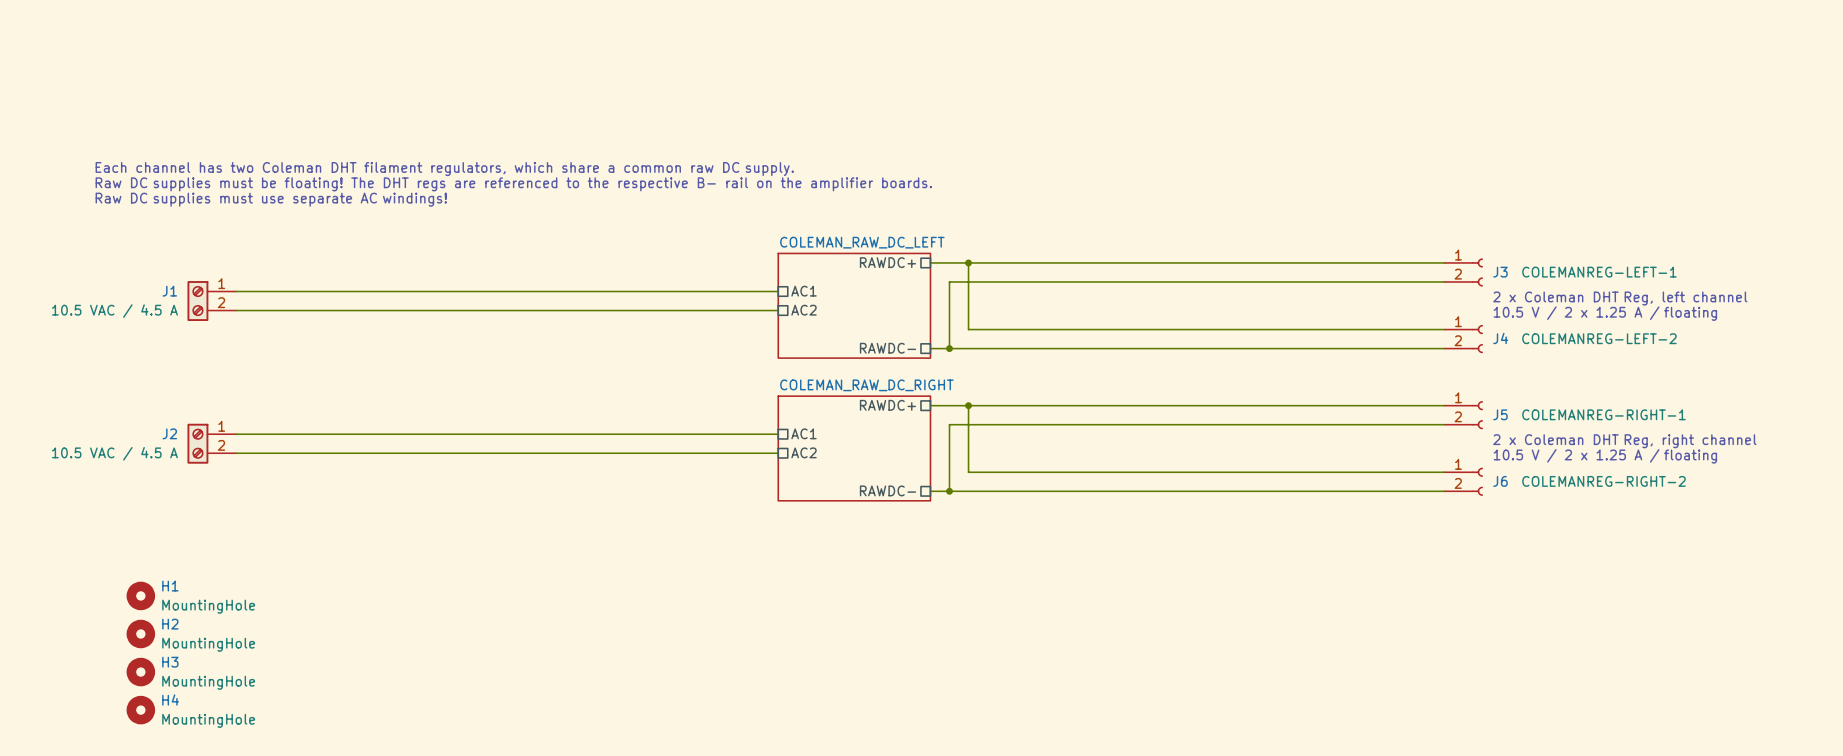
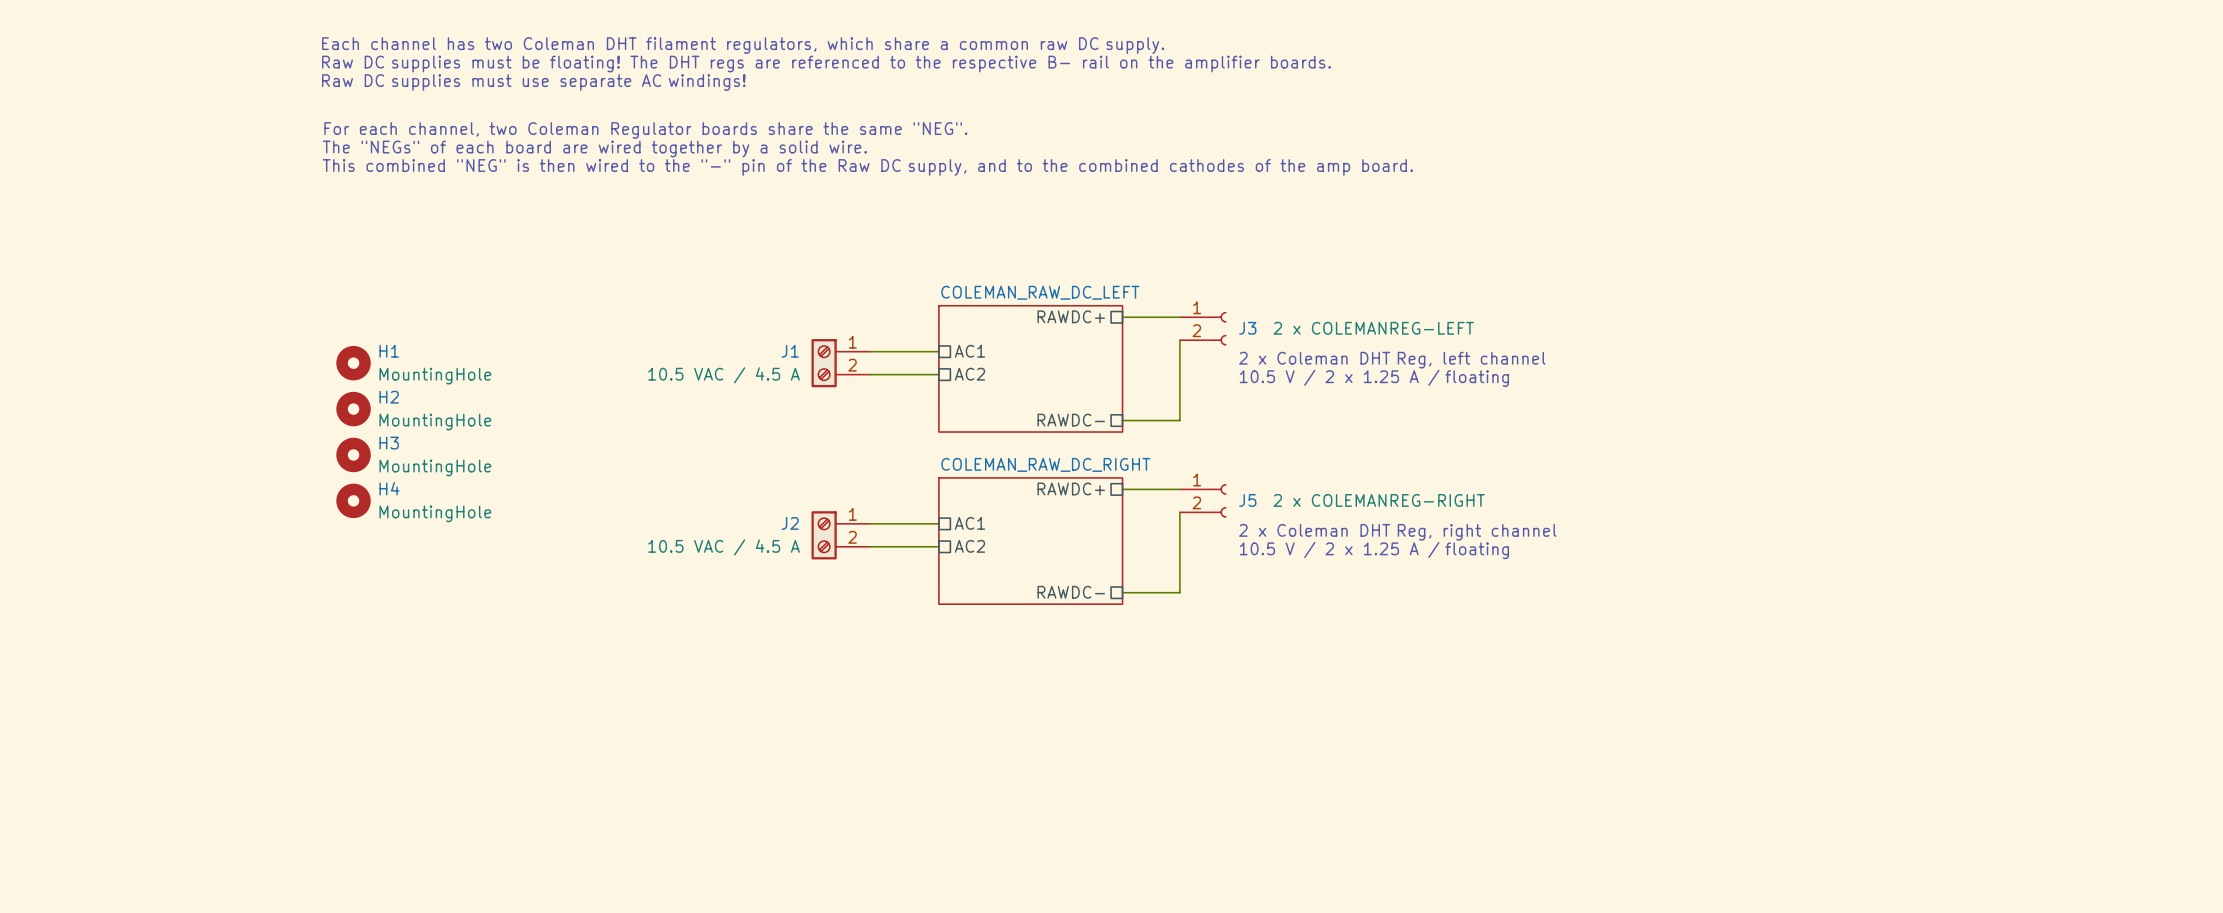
text: none -> Each channel has two Coleman DHT filament regulators, which share a common raw DC supply. (743, 45)
text: none -> Raw DC supplies must be floating! The DHT regs are referenced to the respective B- rail on the amplifier boards. (826, 64)
text: none -> Raw DC supplies must use separate AC windings! (533, 82)
text: none -> For each channel, two Coleman Regulator boards share the same "NEG". (645, 130)
text: none -> The "NEGs" of each board are wired together by a solid wire. (594, 148)
text: none -> This combined "NEG" is then wired to the "-" pin of the Raw DC supply, and to the combined cathodes of the amp board. (867, 167)
text: Each channel has two Coleman DHT filament regulators, which share a common raw DC supply. (444, 169) -> none
text: Raw DC supplies must be floating! The DHT regs are referenced to the respective B- rail on the amplifier boards. (513, 184) -> none
text: Raw DC supplies must use separate AC windings! (271, 199) -> none
wire: (968, 262) (968, 329) (1444, 329) -> none
junction: (968, 262) -> none
wire: (978, 262) (1444, 262) -> none
J3 position: (1463, 272) -> (1203, 328)
J3 value: COLEMANREG-LEFT-1 (1599, 272) -> 2 x COLEMANREG-LEFT (1373, 328)
wire: (1444, 281) (949, 281) (949, 348) -> none
wire: (235, 291) (721, 291) -> none
text: none -> 2 x Coleman DHT Reg, left channel (1392, 360)
text: 2 x Coleman DHT Reg, left channel (1620, 298) -> none
J1 position: (211, 301) -> (840, 363)
wire: (235, 310) (721, 310) -> none
text: none -> 10.5 V / 2 x 1.25 A / floating (1374, 378)
text: 10.5 V / 2 x 1.25 A / floating (1605, 313) -> none
J4: COLEMANREG-LEFT-2 (1463, 339) -> none
junction: (949, 348) -> none
wire: (978, 348) (1444, 348) -> (1179, 420) (1179, 340)
wire: (968, 405) (968, 472) (1444, 472) -> none
junction: (968, 405) -> none
wire: (978, 405) (1444, 405) -> none
J5 value: COLEMANREG-RIGHT-1 (1603, 414) -> 2 x COLEMANREG-RIGHT (1379, 500)
J5 position: (1463, 415) -> (1203, 500)
wire: (1444, 424) (949, 424) (949, 491) -> none
wire: (235, 434) (721, 434) -> none
text: none -> 2 x Coleman DHT Reg, right channel (1397, 532)
text: 2 x Coleman DHT Reg, right channel (1624, 441) -> none
J2 position: (211, 443) -> (840, 535)
wire: (235, 453) (721, 453) -> none
text: none -> 10.5 V / 2 x 1.25 A / floating (1374, 550)
text: 10.5 V / 2 x 1.25 A / floating (1605, 456) -> none
J6: COLEMANREG-RIGHT-2 (1463, 481) -> none
junction: (949, 491) -> none
wire: (978, 491) (1444, 491) -> (1179, 592) (1179, 512)
H1 position: (140, 595) -> (353, 363)
H2 position: (140, 634) -> (353, 409)
H3 position: (140, 672) -> (353, 454)
H4 position: (140, 710) -> (353, 500)

